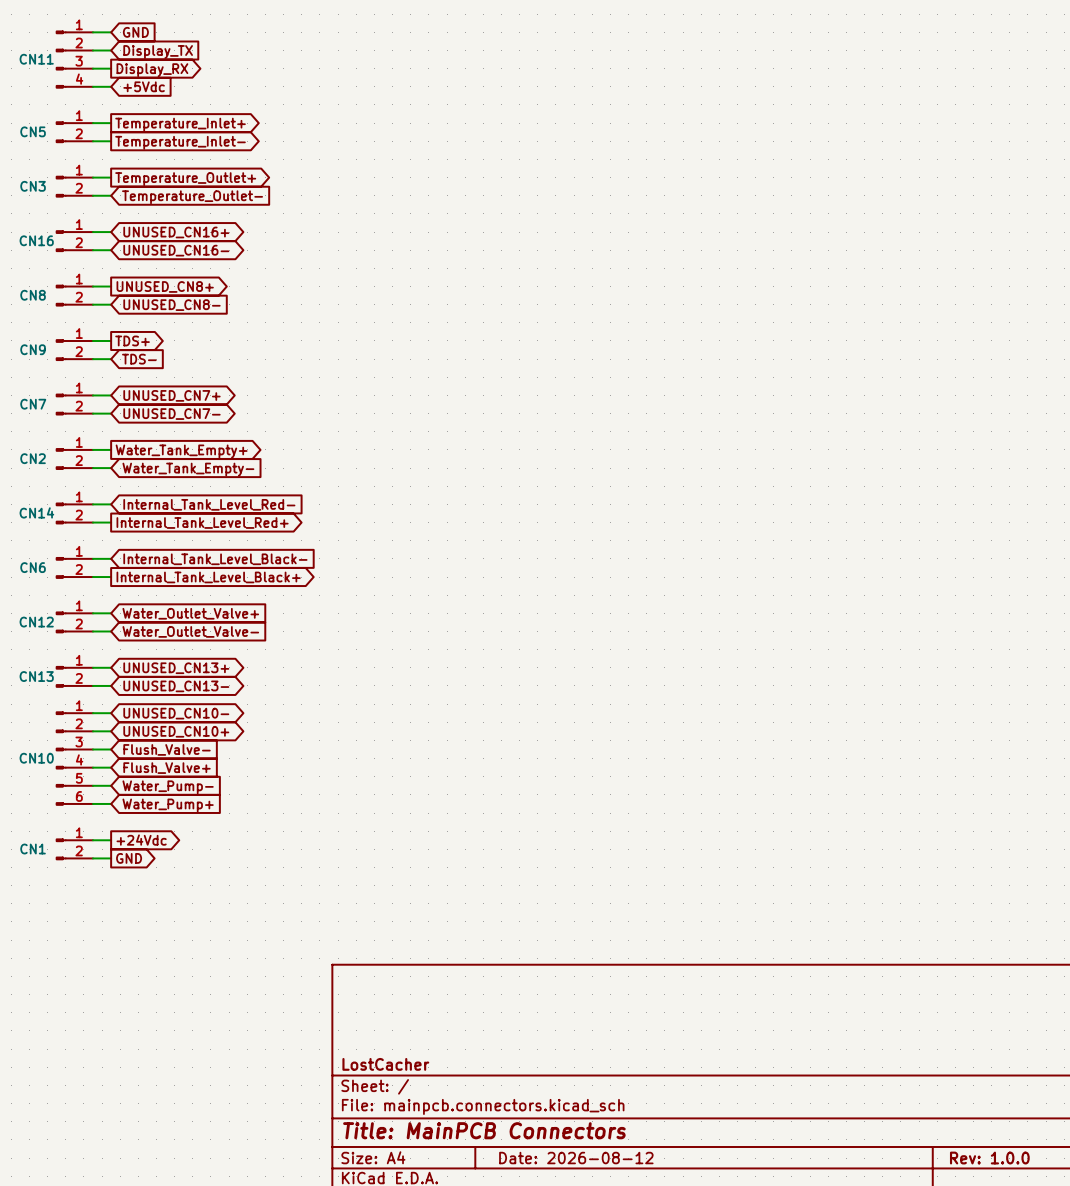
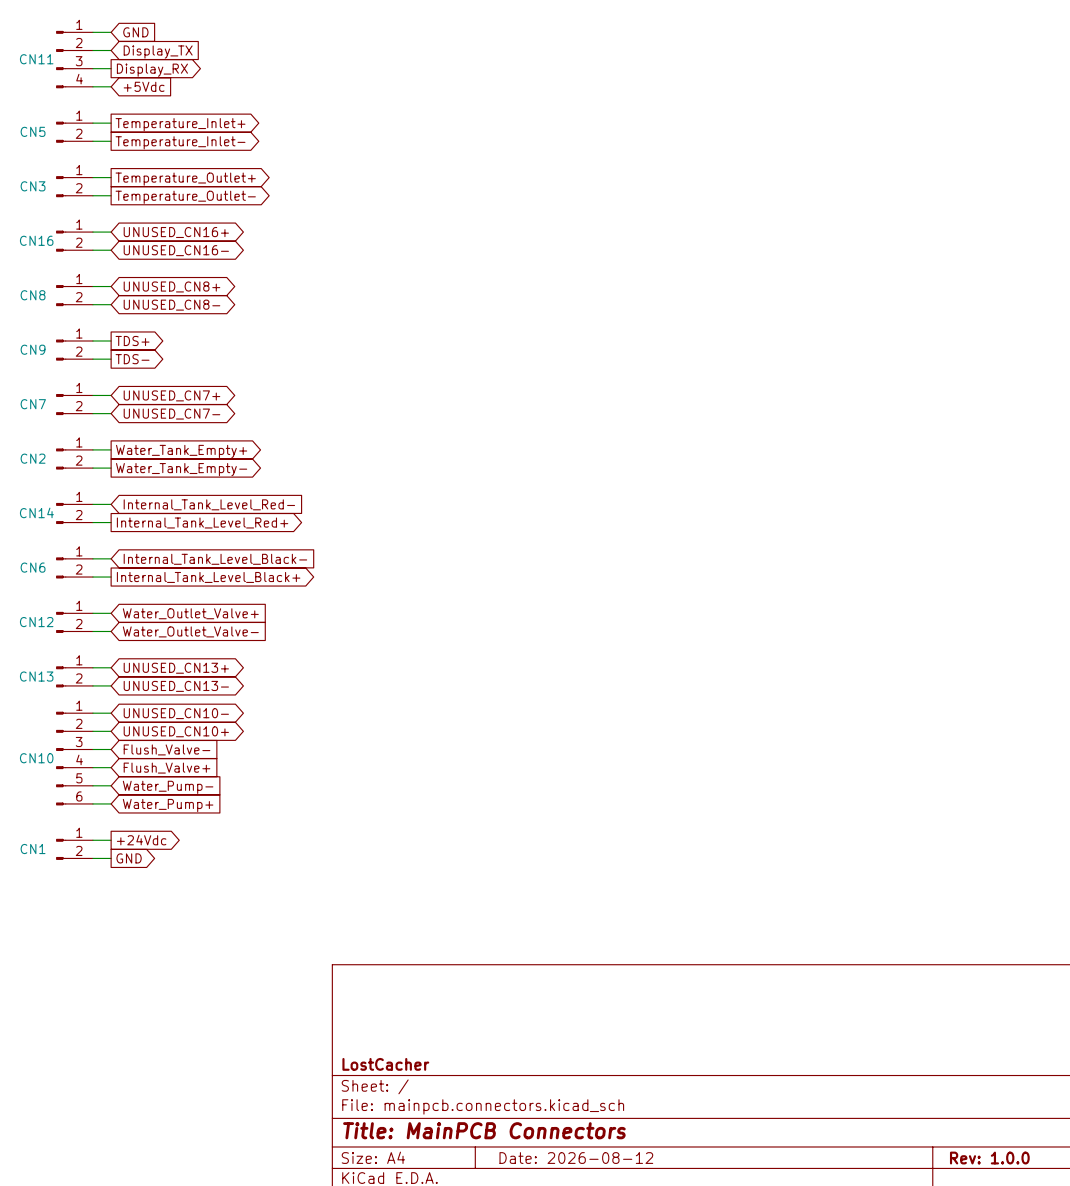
global label shape: input (192, 197) -> output (185, 197)
global label shape: output (165, 286) -> bidirectional (171, 286)
global label shape: input (171, 305) -> bidirectional (171, 305)
global label shape: input (139, 359) -> output (132, 359)
global label shape: input (188, 469) -> output (181, 469)

